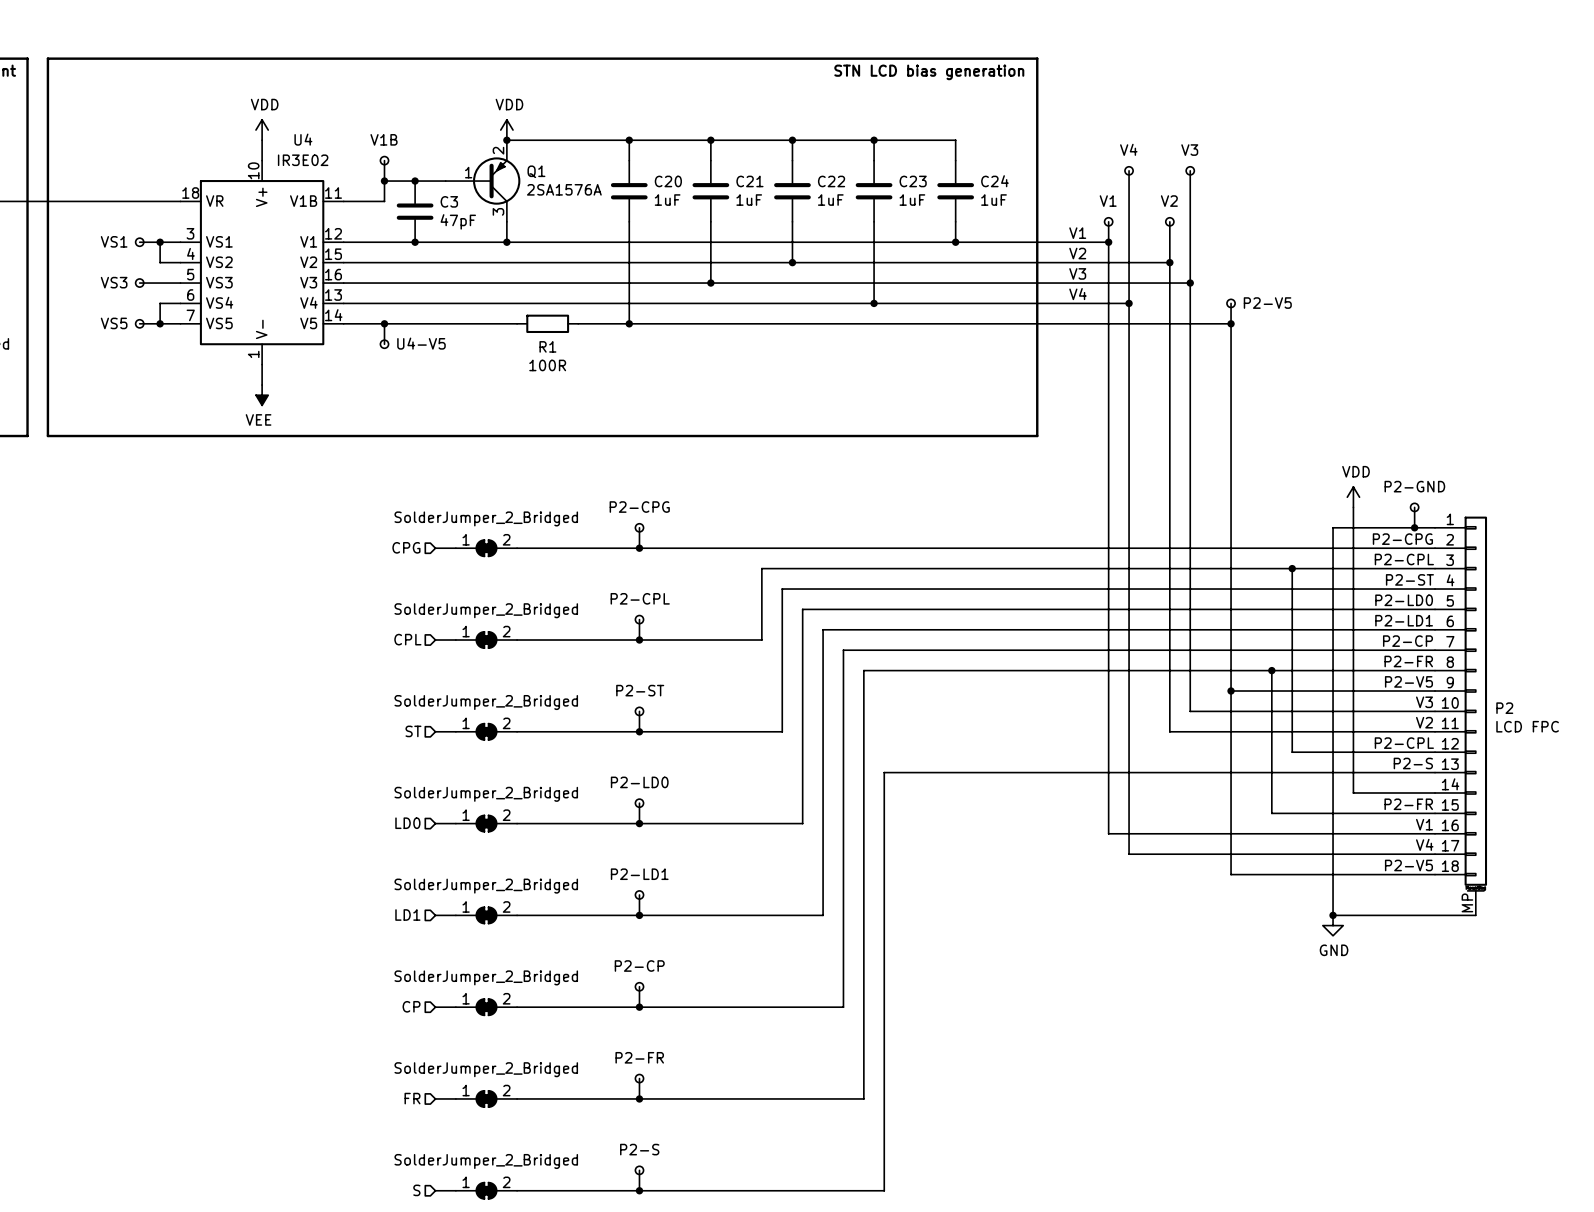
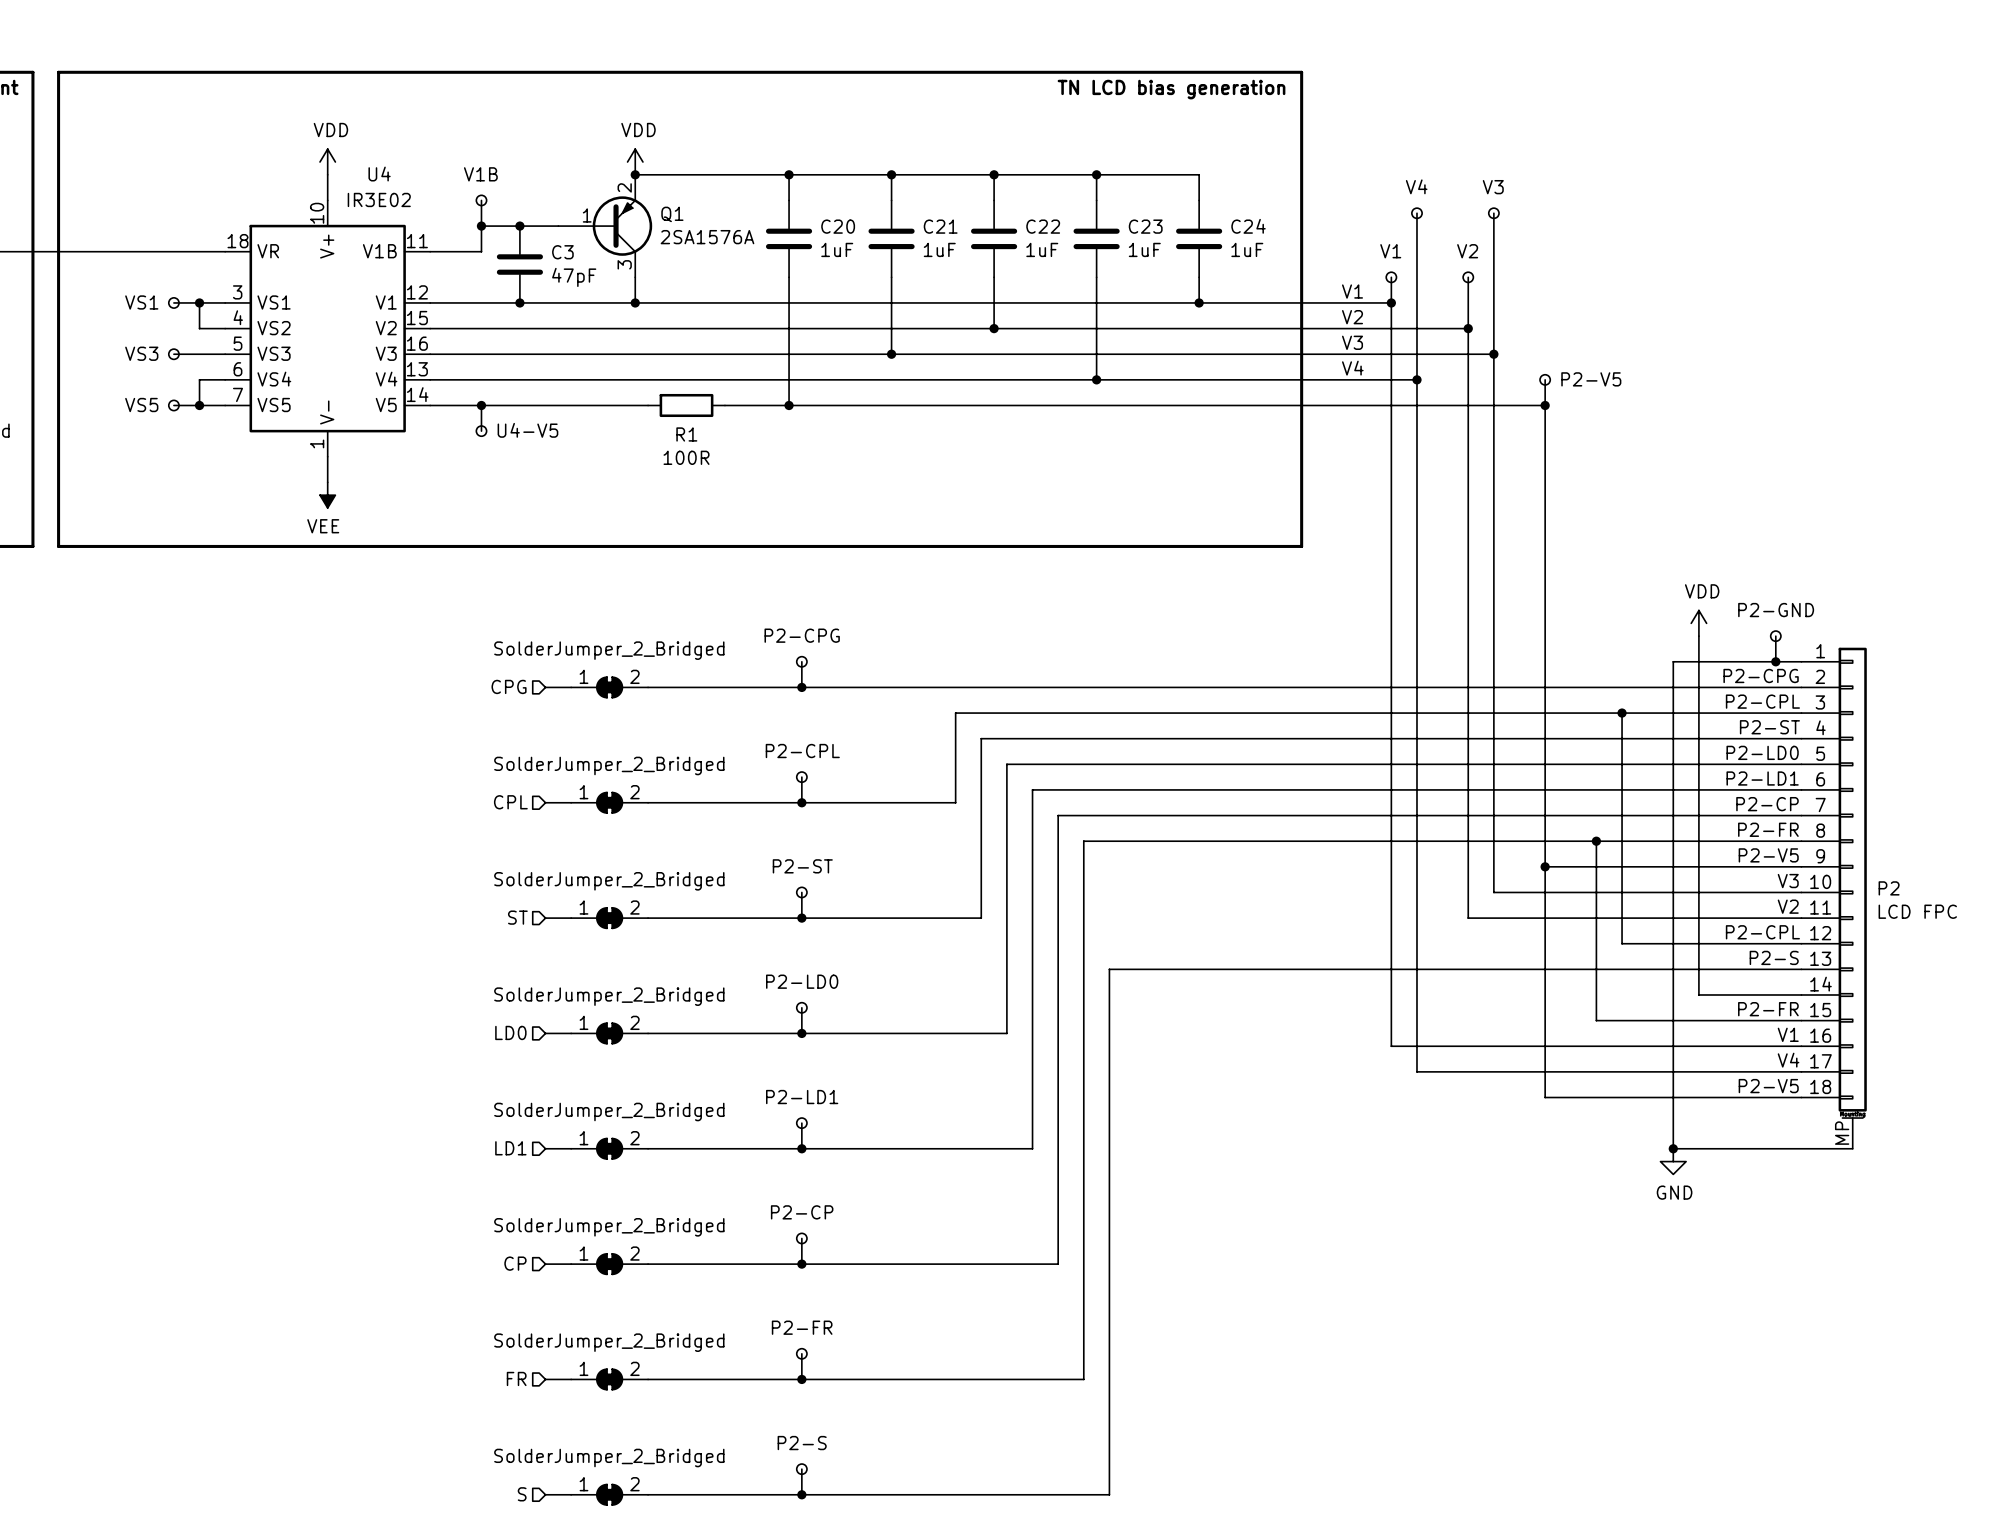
text: STN LCD bias generation (929, 72) -> TN LCD bias generation (1171, 89)

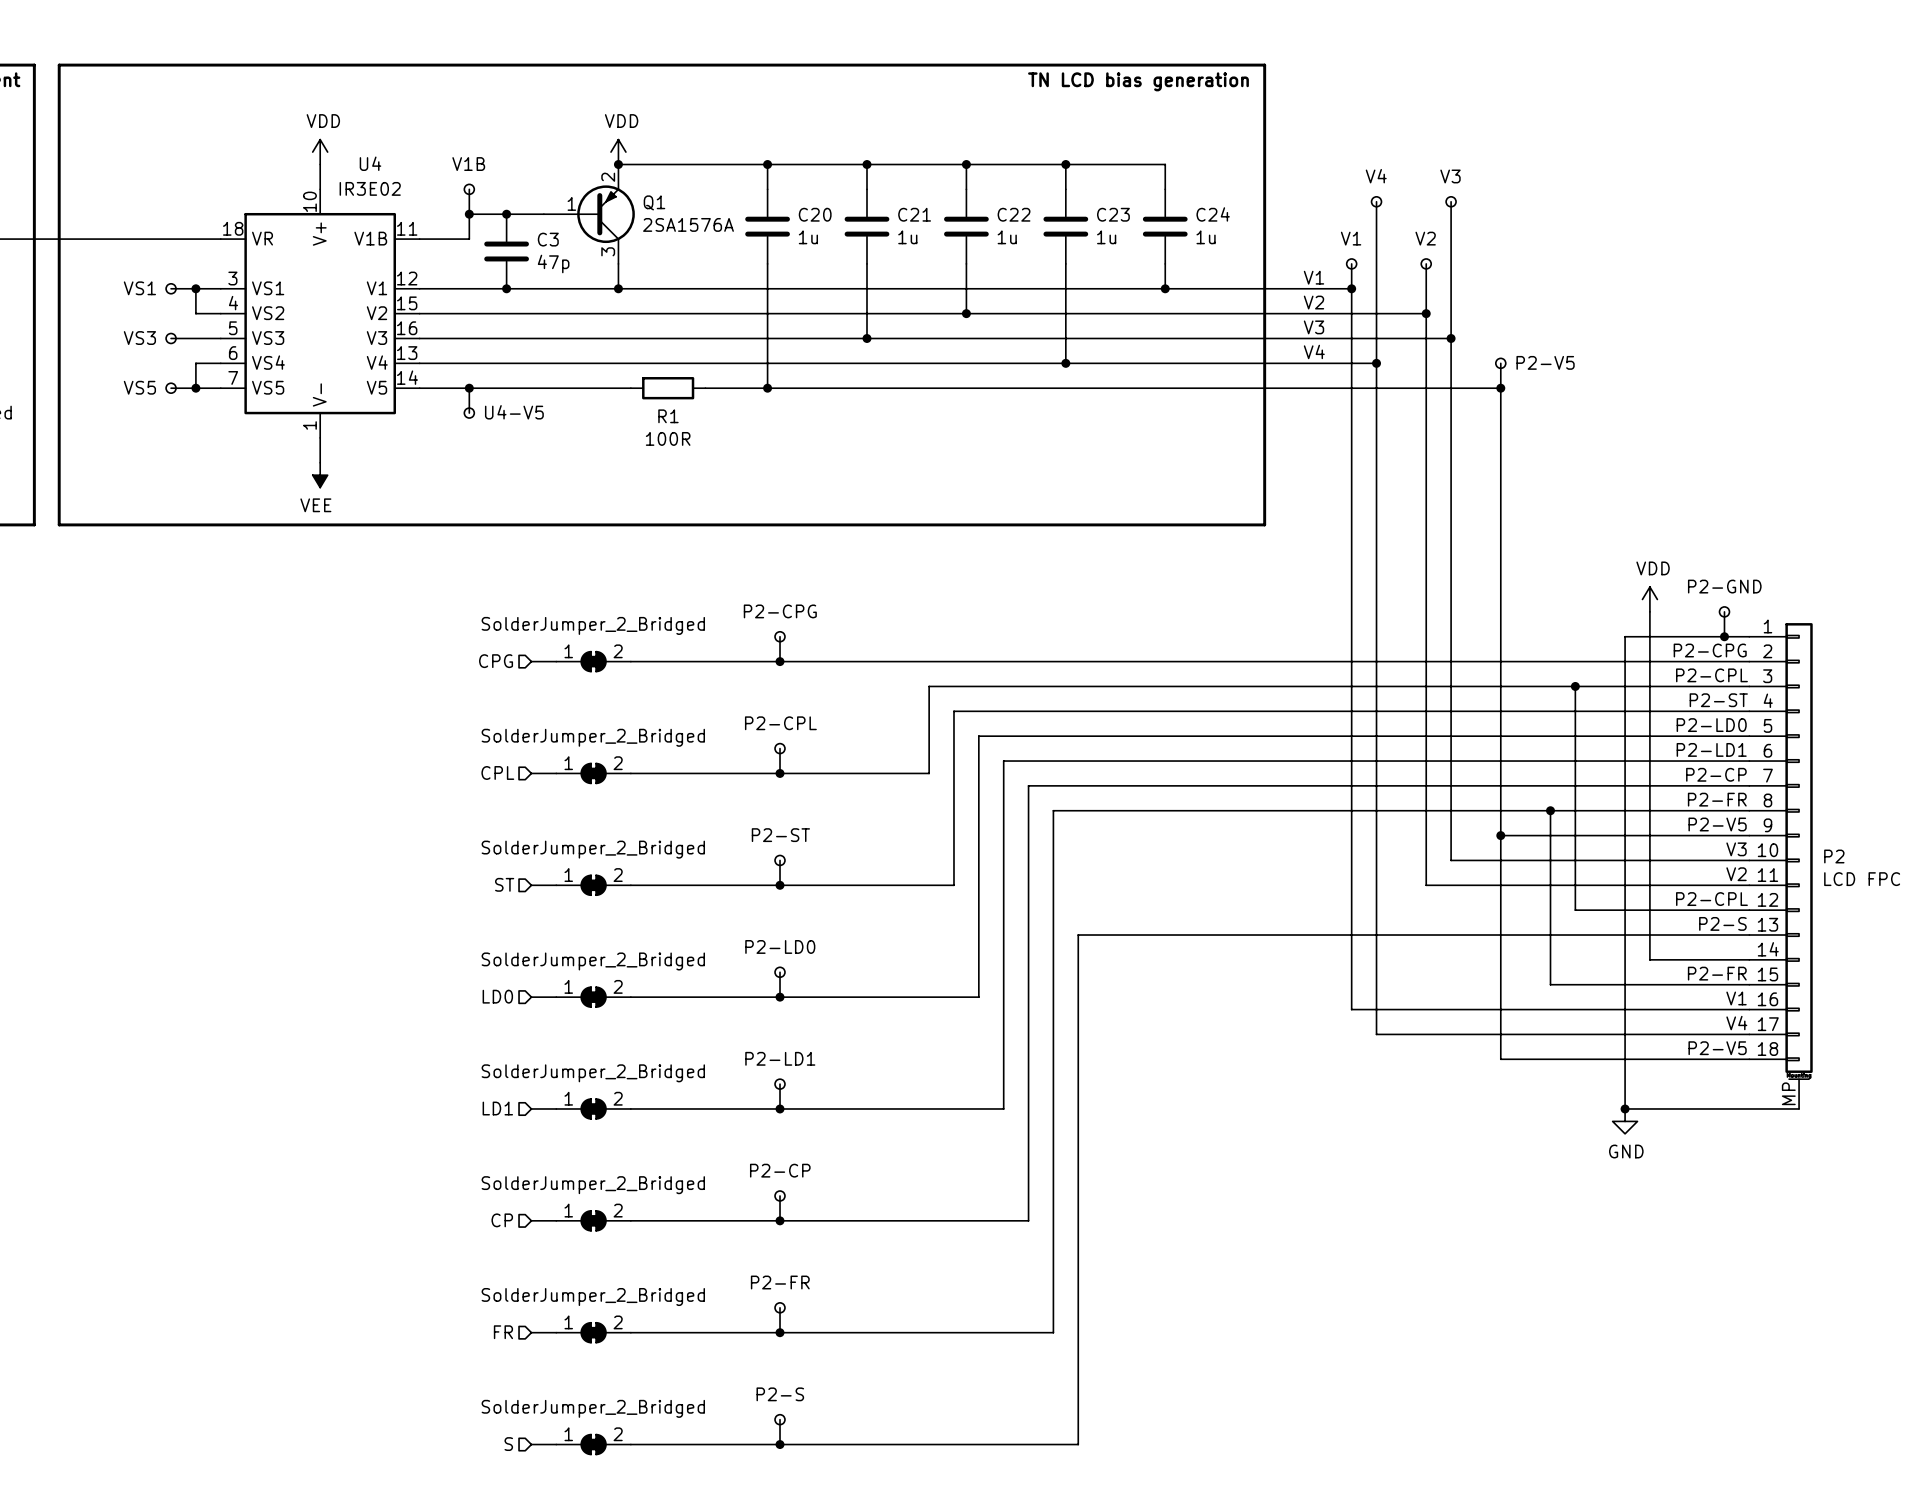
C20 value: 1uF (837, 249) -> 1u (808, 237)
C21 value: 1uF (939, 249) -> 1u (907, 237)
C22 value: 1uF (1042, 249) -> 1u (1007, 237)
C23 value: 1uF (1144, 249) -> 1u (1106, 237)
C24 value: 1uF (1247, 249) -> 1u (1206, 237)
C3 value: 47pF (574, 277) -> 47p (553, 263)

